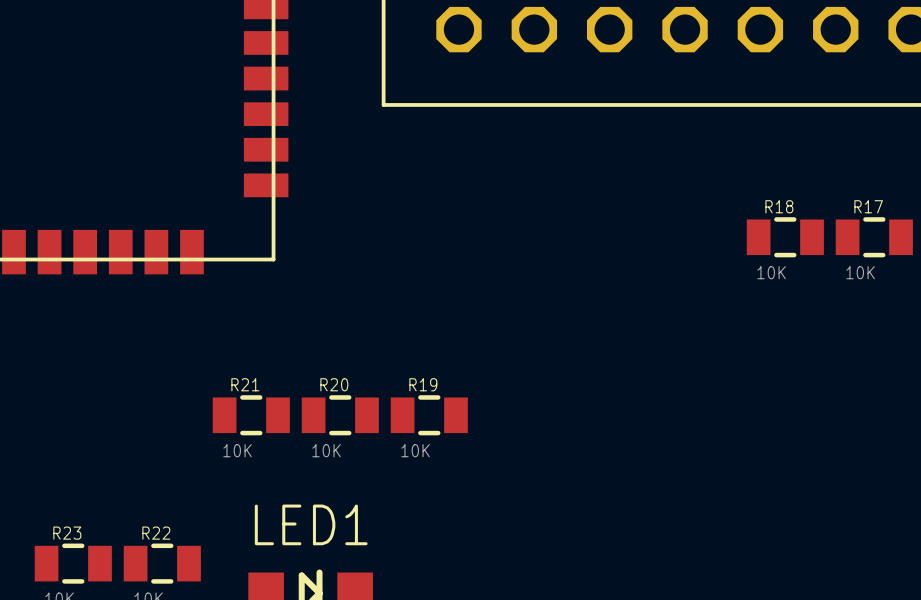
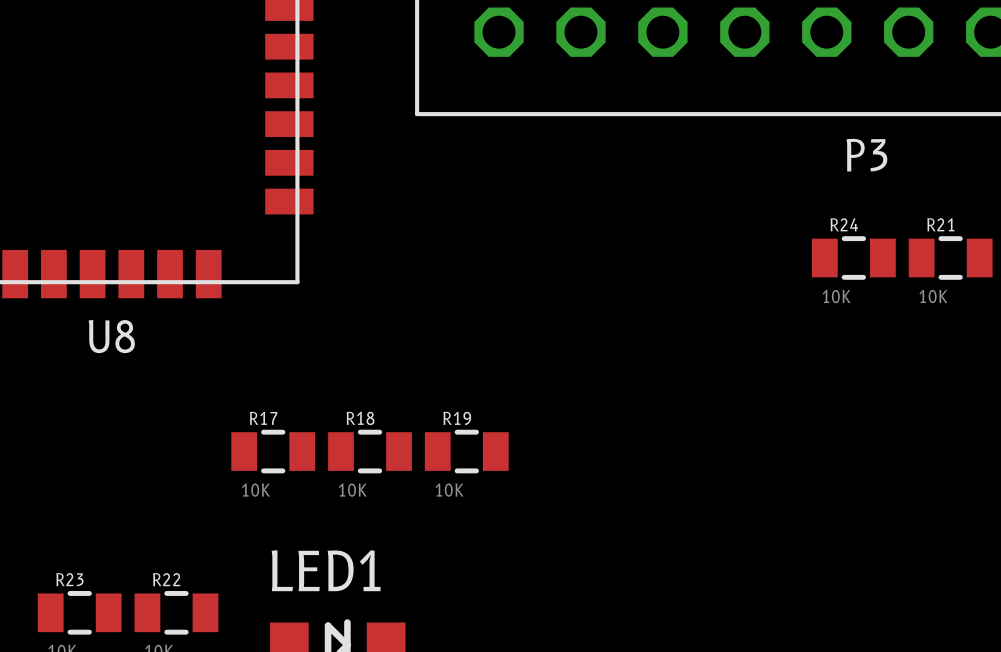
P3 name: none -> P3 (866, 155)
R18 name: R18 (779, 206) -> R24 (844, 224)
R17 name: R17 (868, 206) -> R21 (940, 224)
U8 name: none -> U8 (111, 336)
R21 name: R21 (245, 384) -> R17 (263, 418)
R20 name: R20 (334, 384) -> R18 (360, 418)

